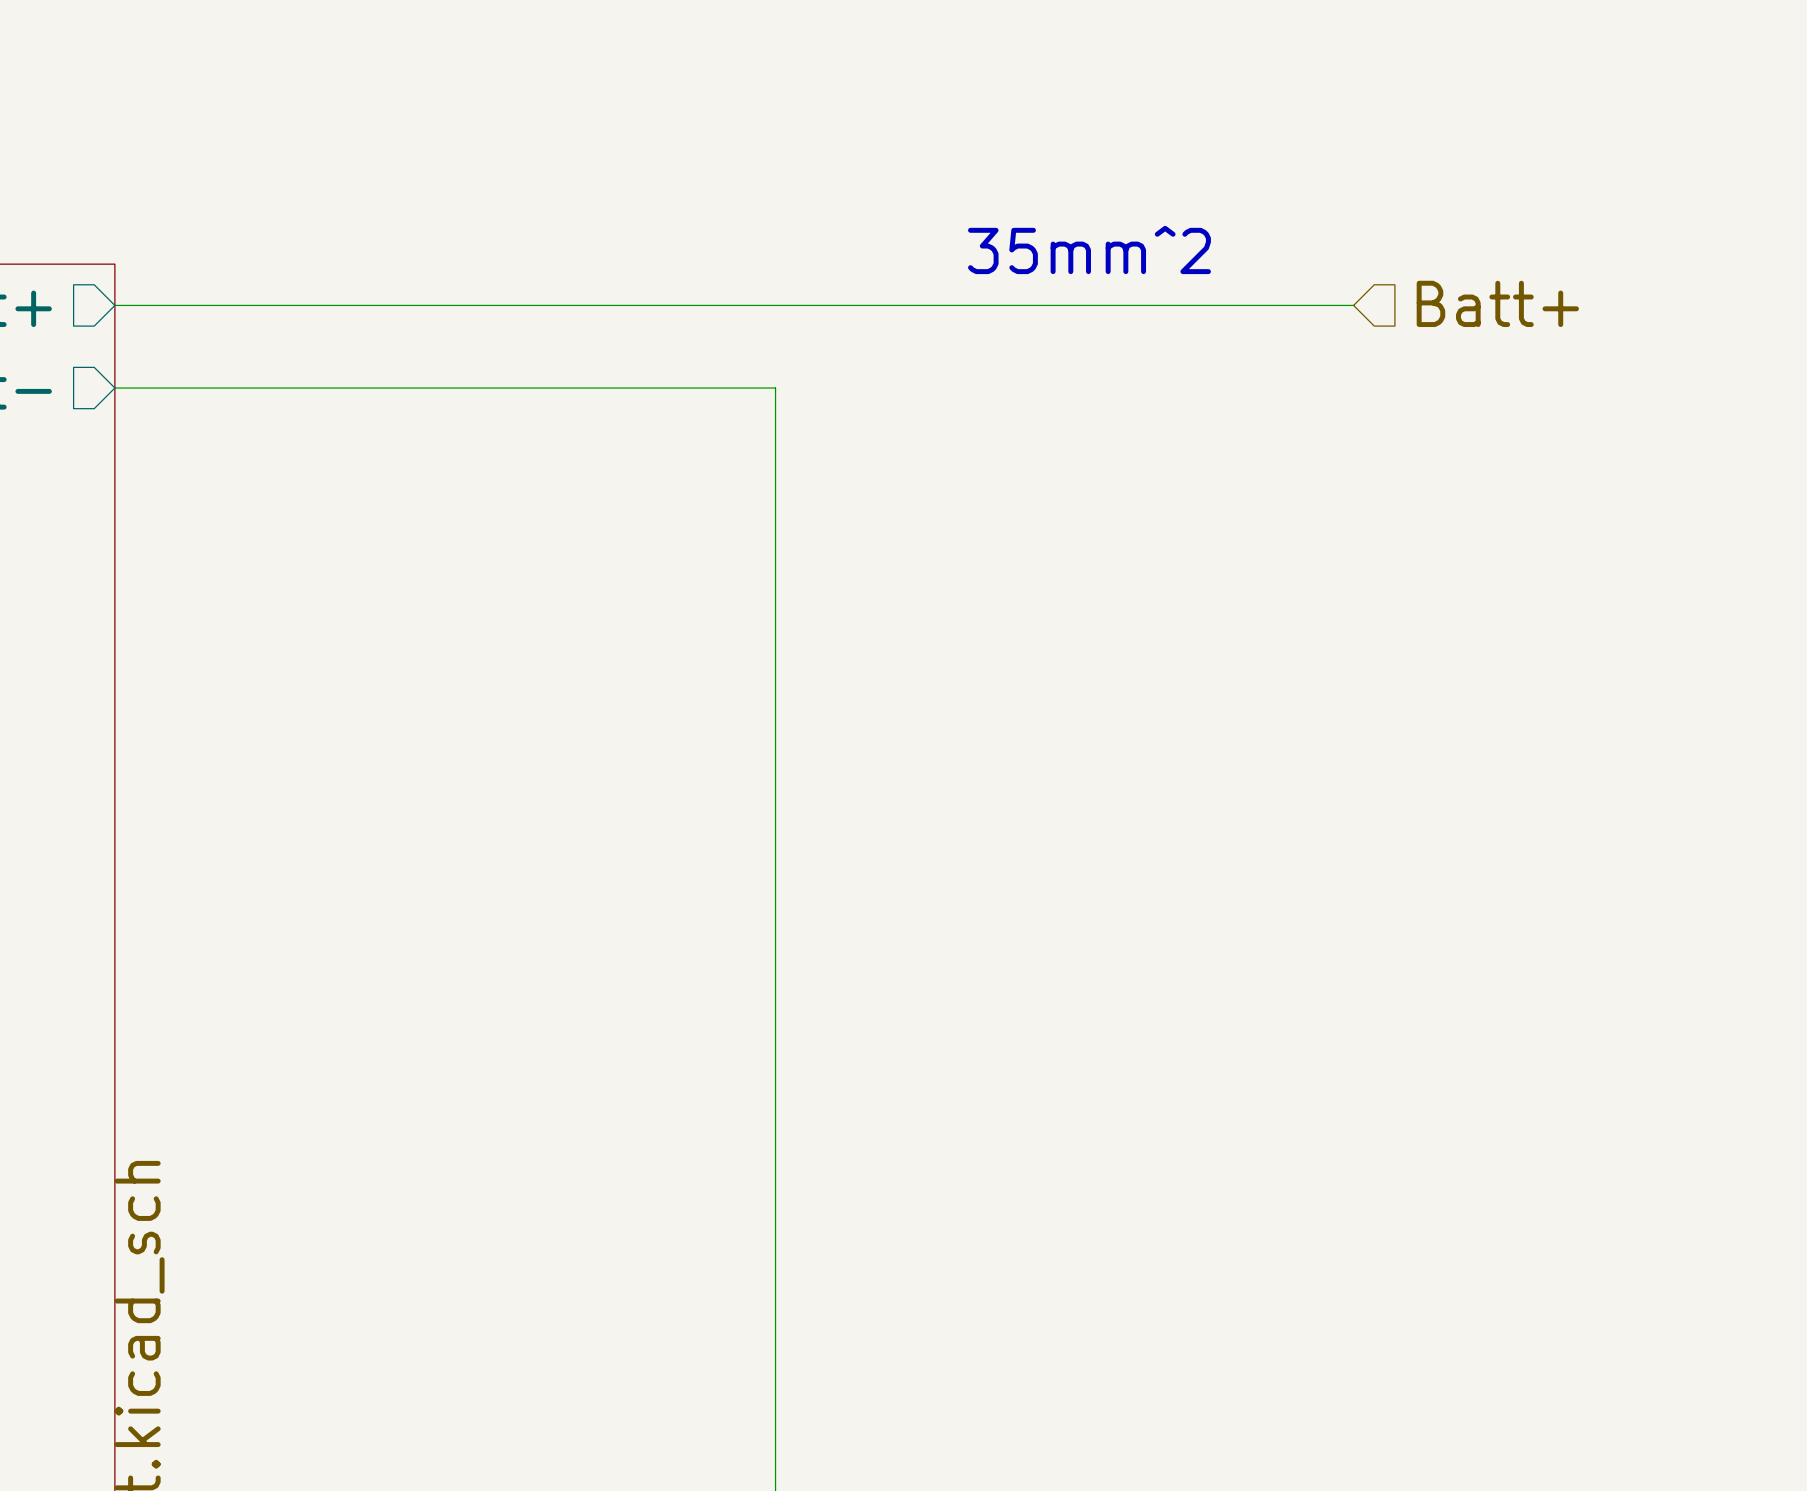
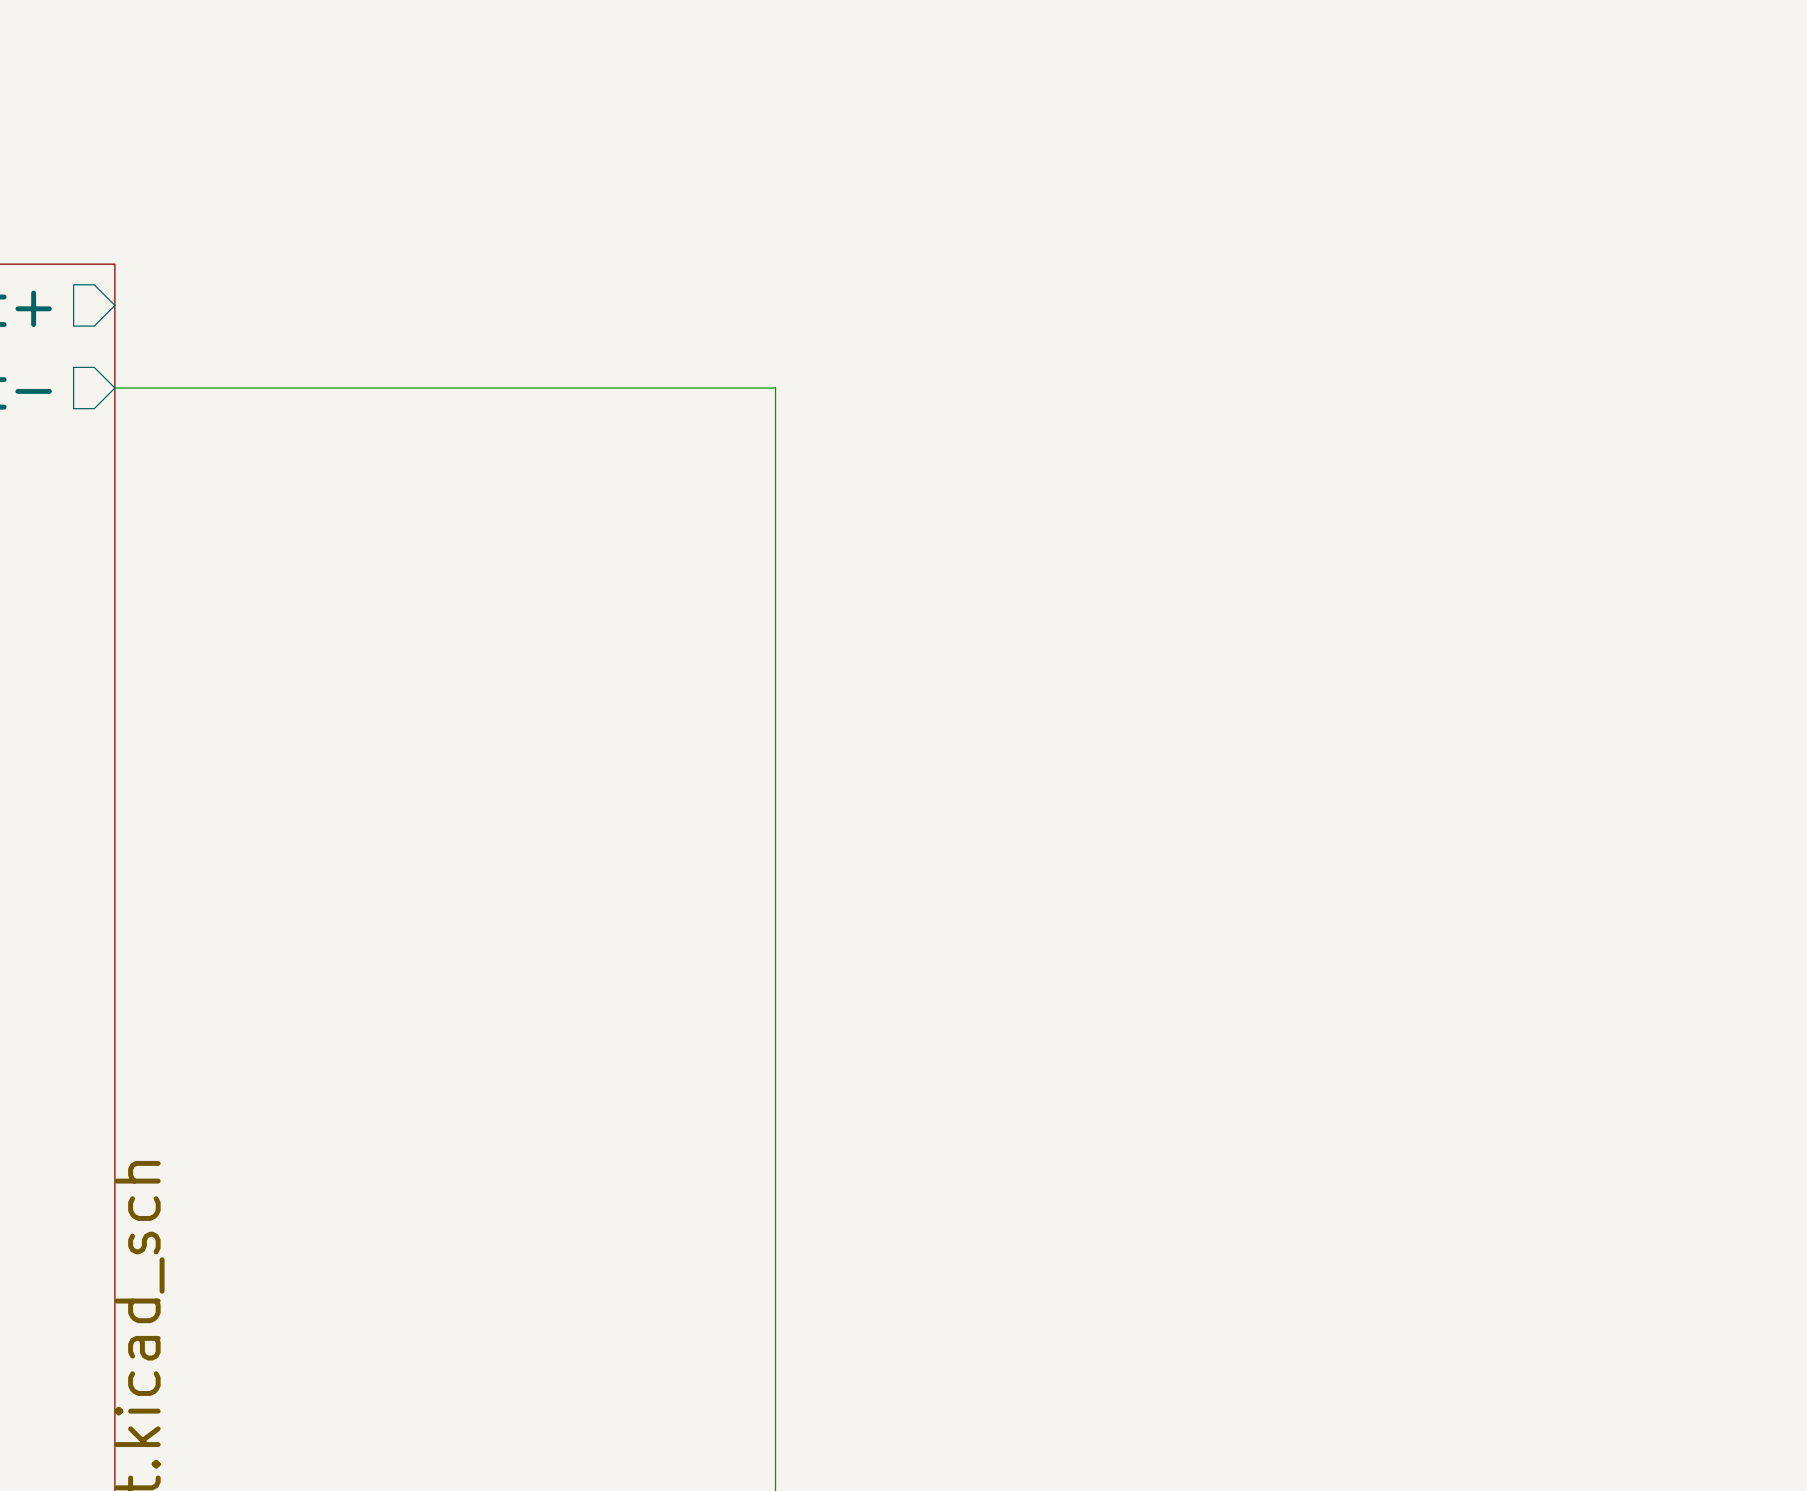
text: 35mm^2 (1089, 249) -> none
hierarchical label: Batt+ (1497, 303) -> none
wire: (114, 305) (1353, 305) -> none

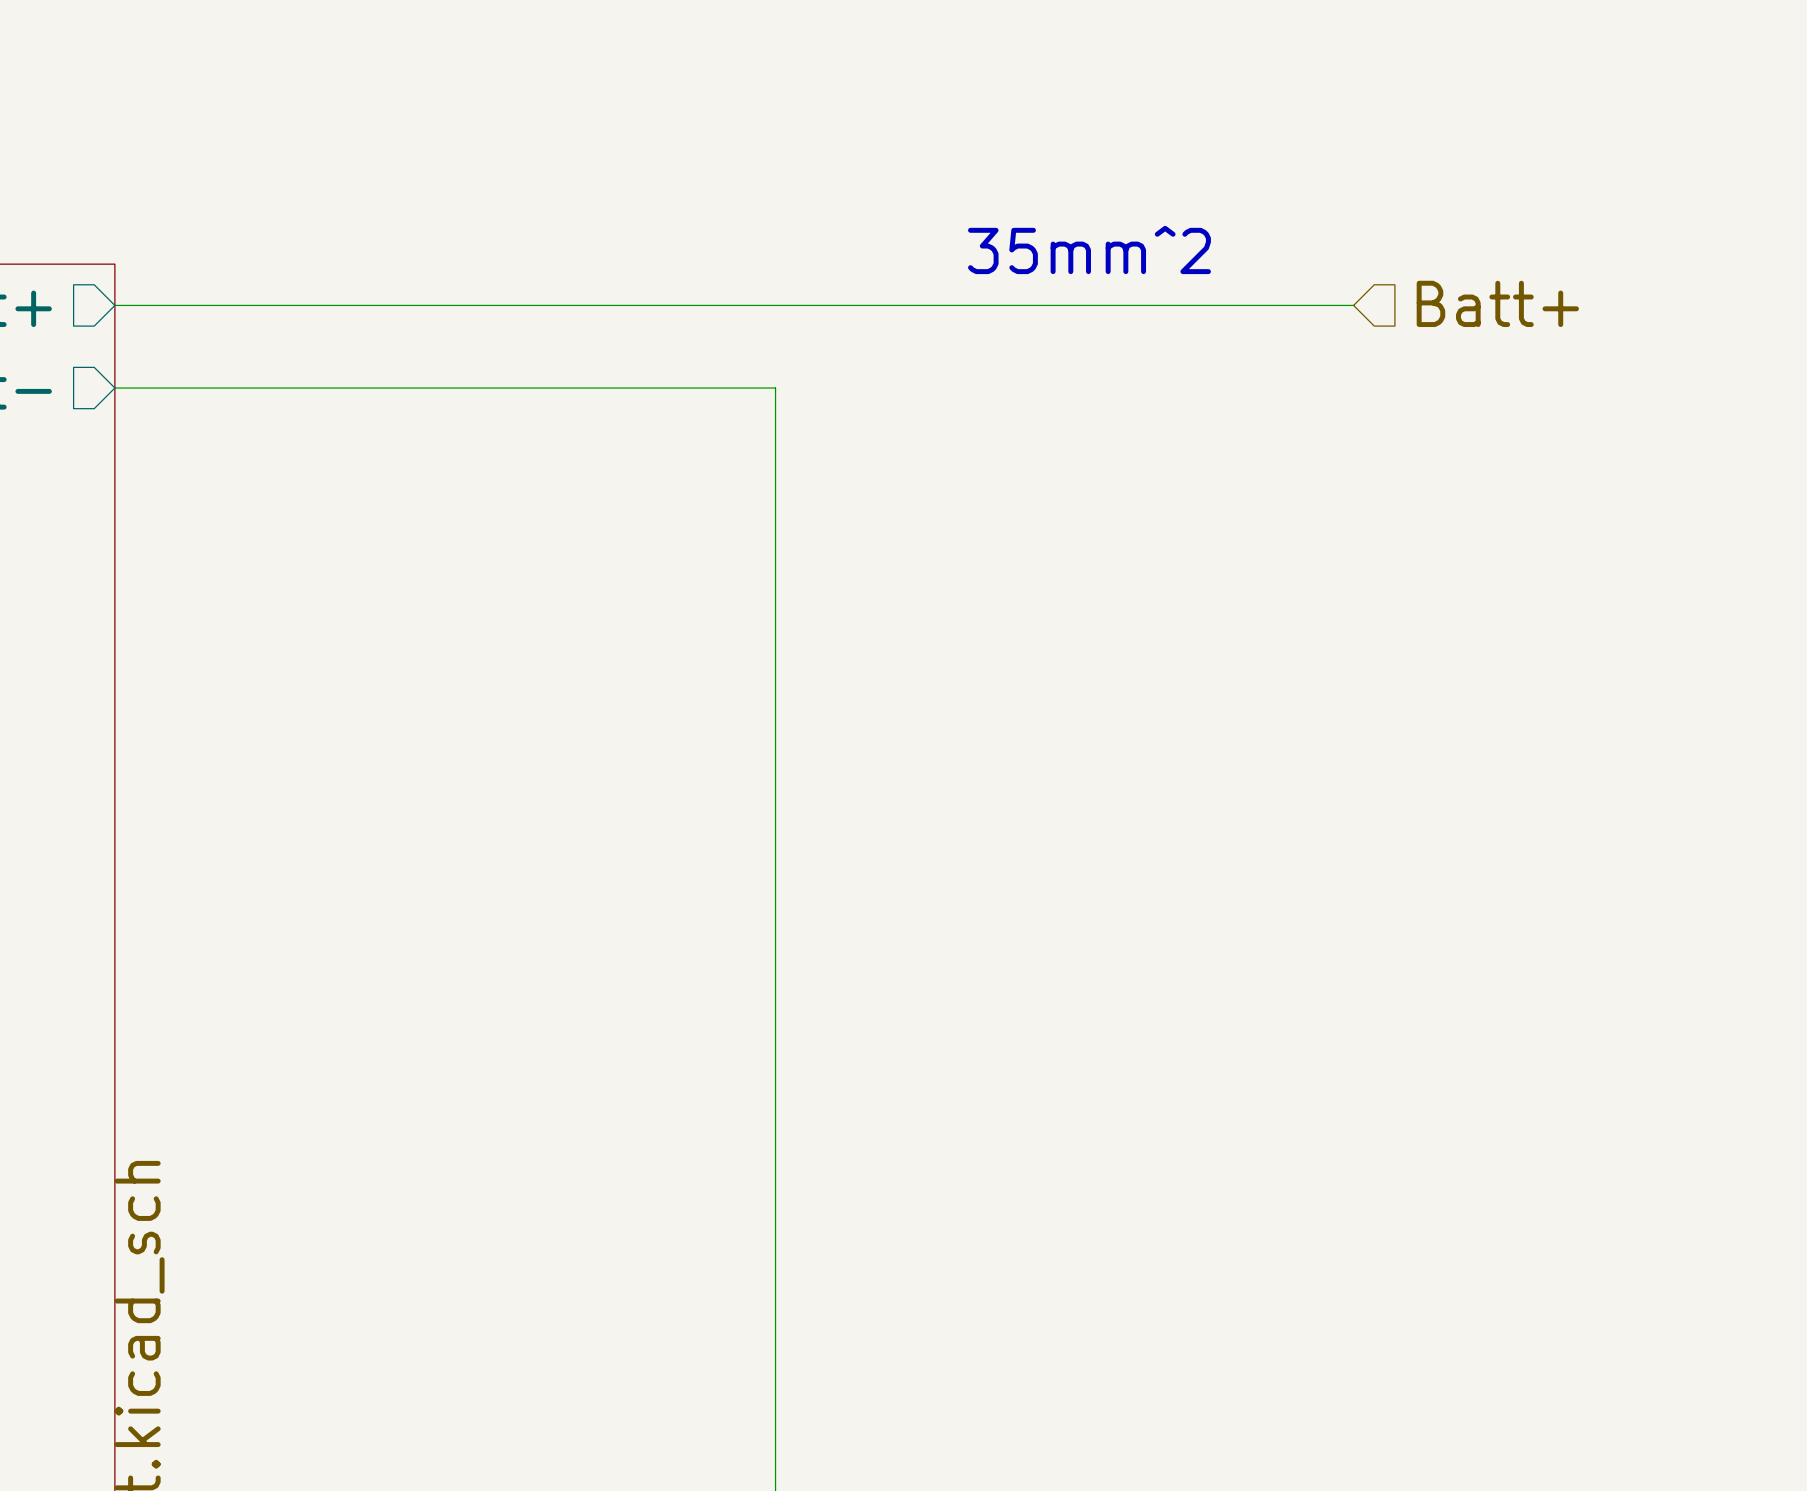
text: none -> 35mm^2 (1089, 249)
hierarchical label: none -> Batt+ (1497, 303)
wire: none -> (114, 305) (1353, 305)

